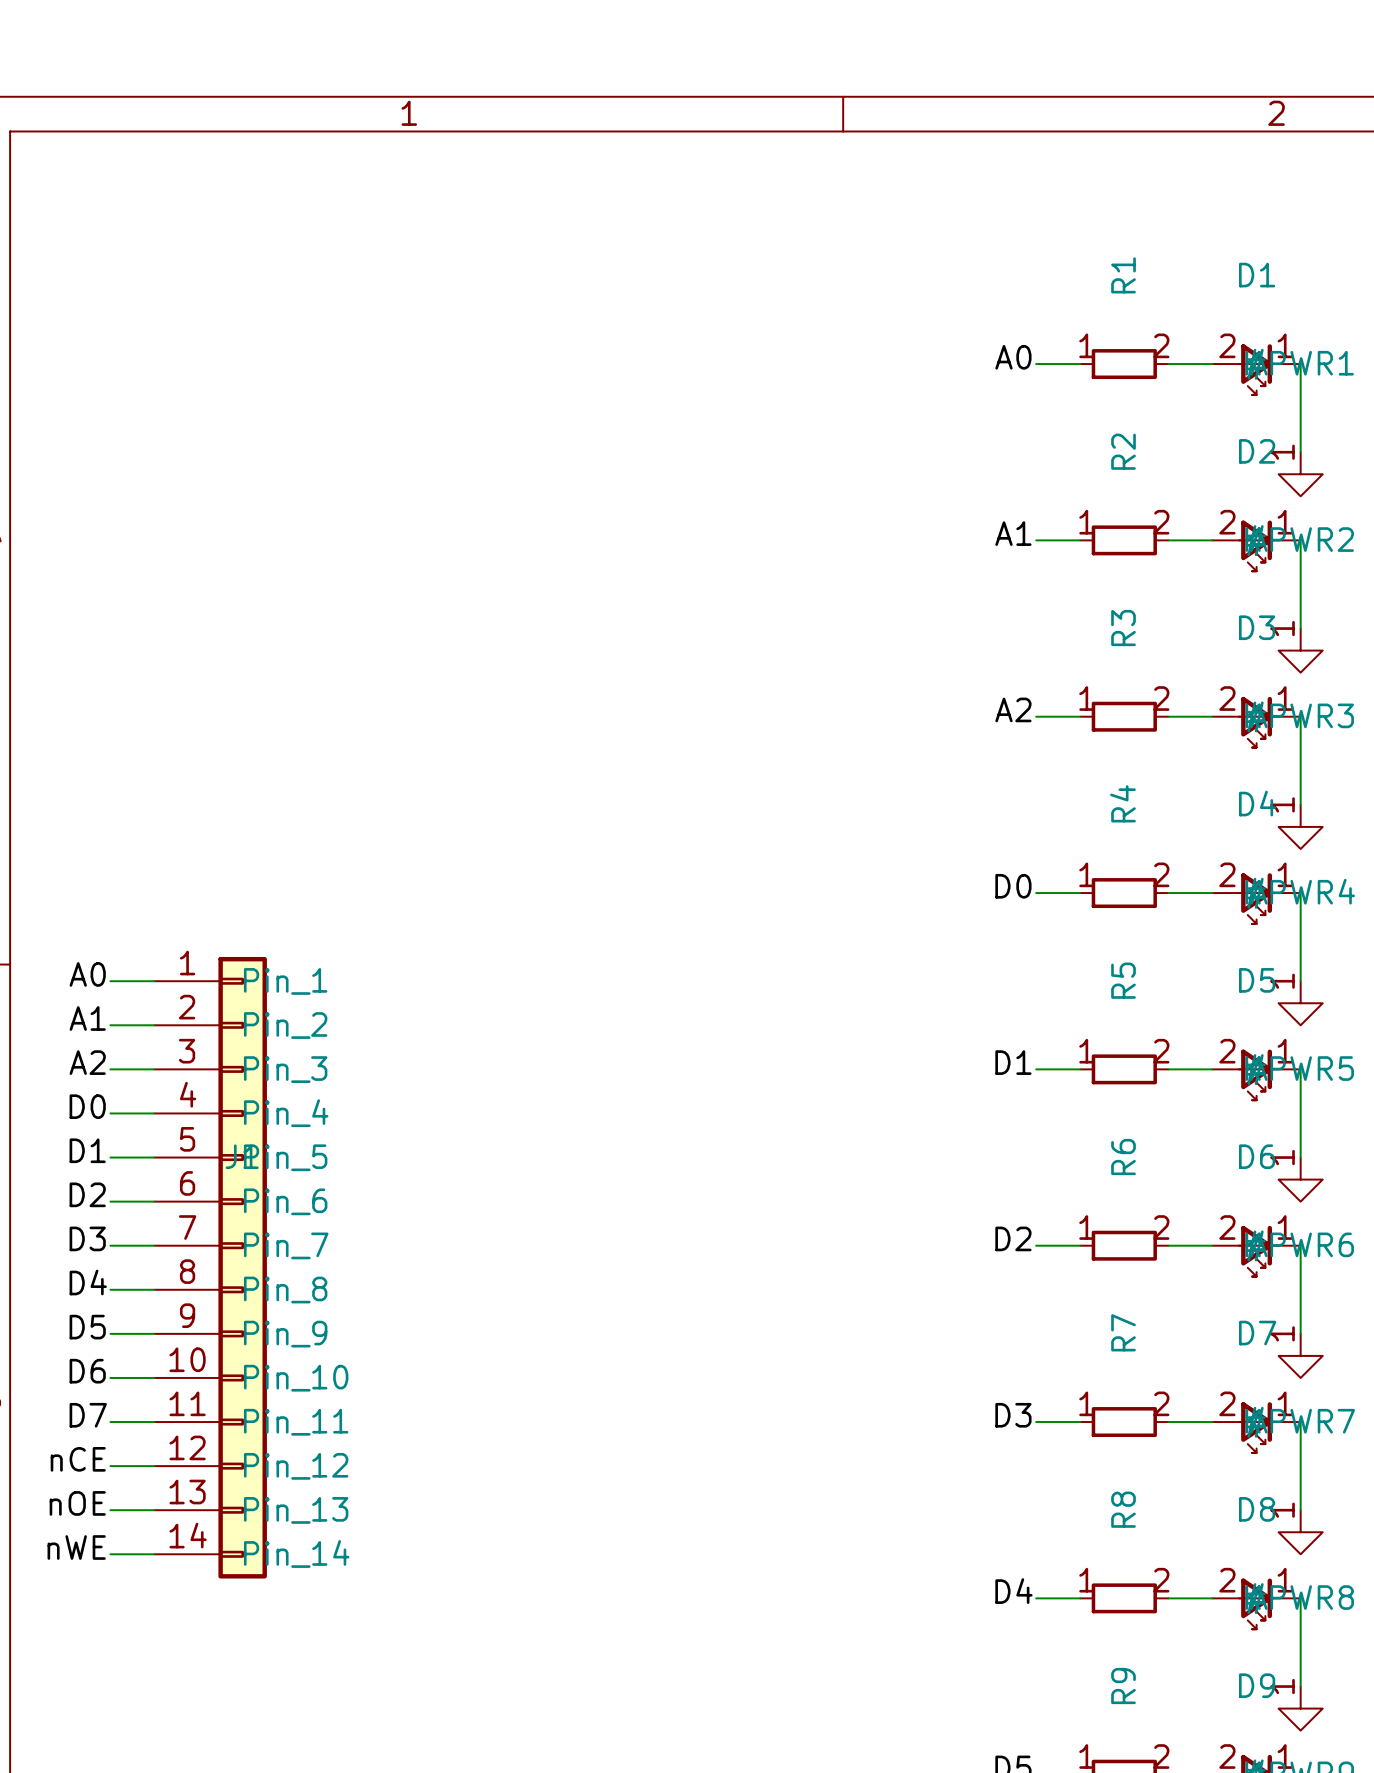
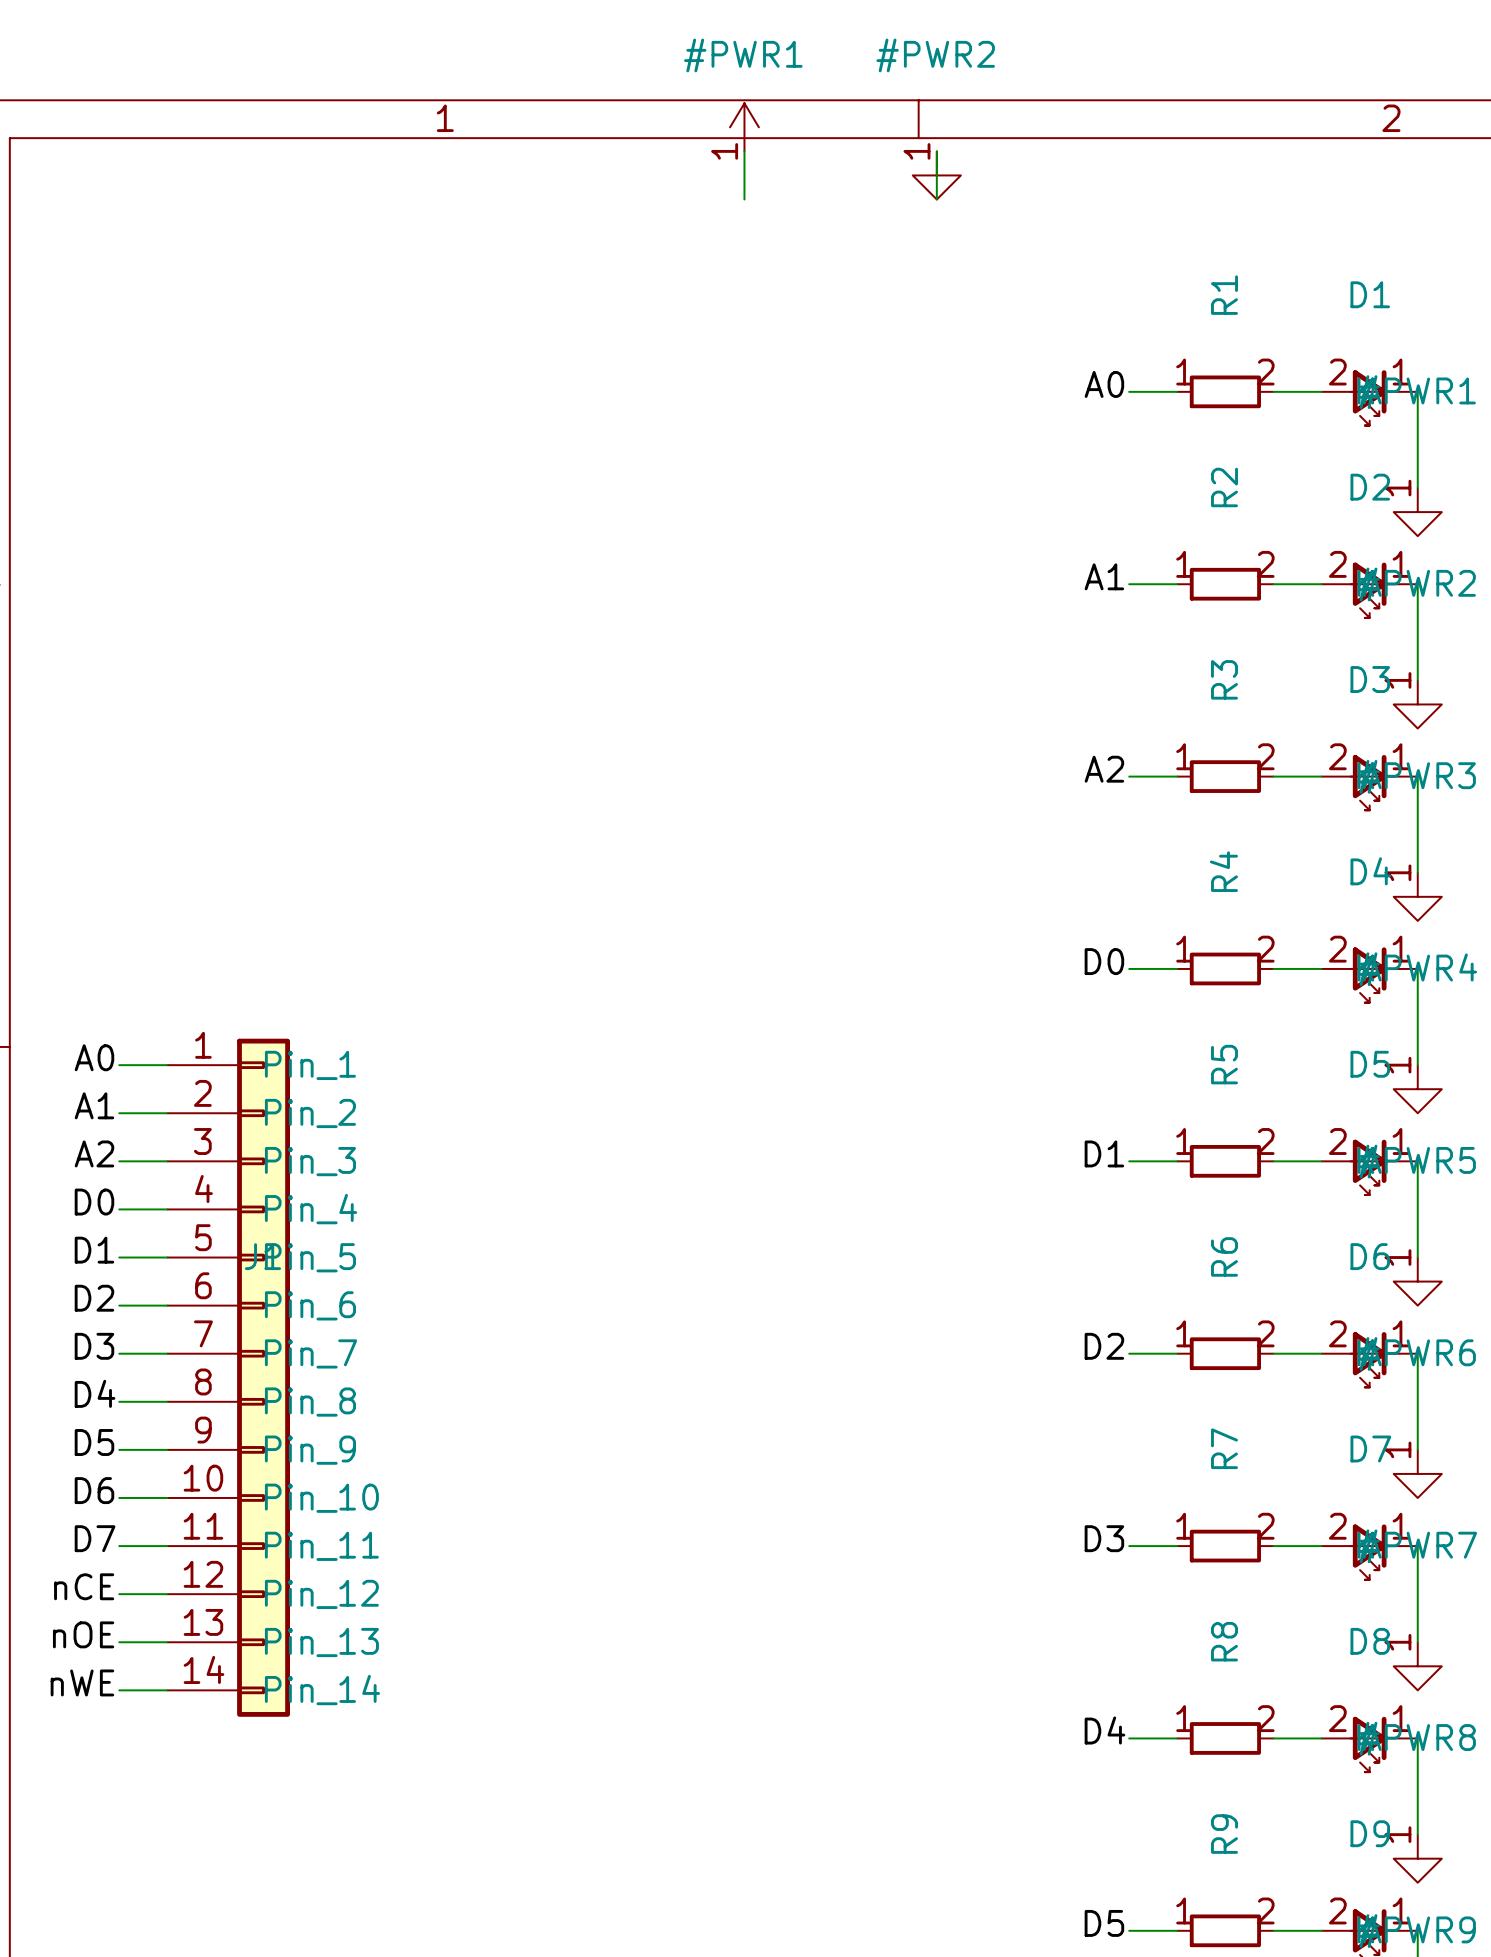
#PWR1: none -> (744, 127)
wire: none -> (744, 151) (744, 199)
wire: none -> (936, 151) (936, 199)
#PWR2: none -> (936, 175)

